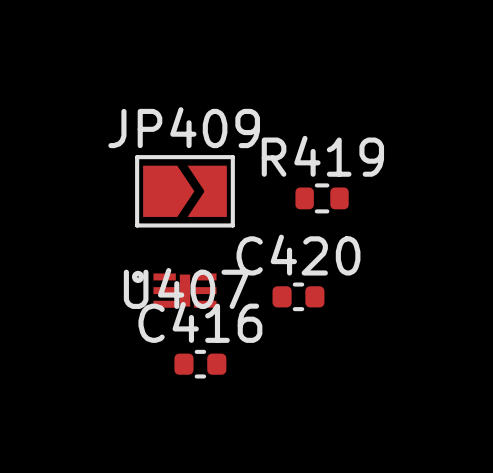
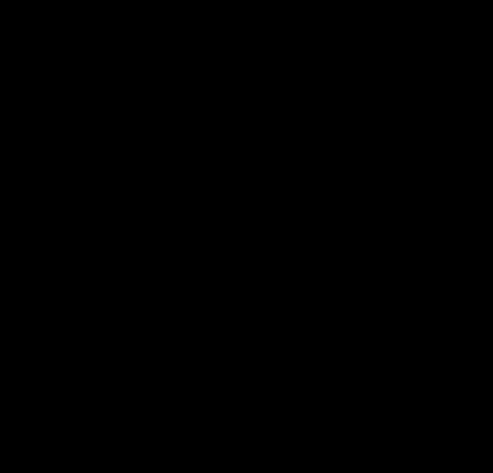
JP409: (184, 191) -> none
R419: (322, 198) -> none
U407: (174, 289) -> none
C420: (298, 296) -> none
C416: (200, 364) -> none

